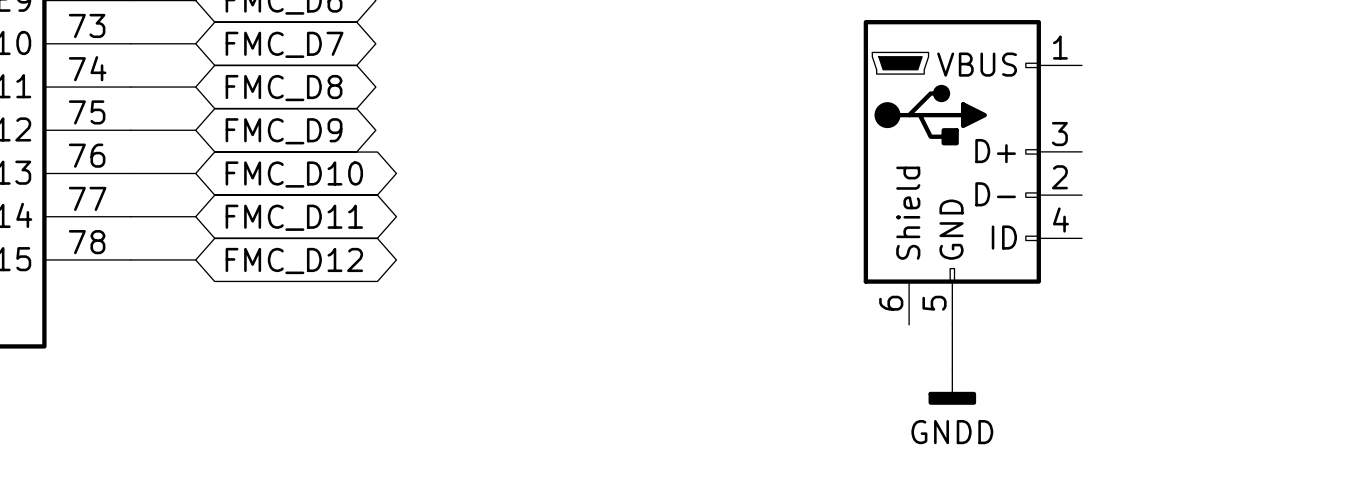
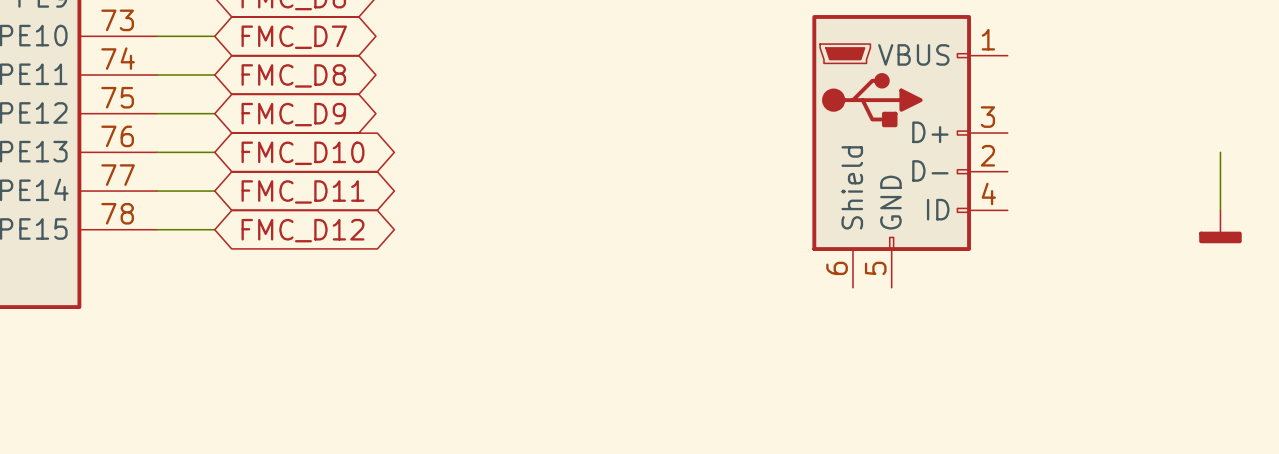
wire: none -> (1220, 152) (1220, 210)
power symbol: none -> (1220, 226)
wire: (952, 324) (952, 368) -> none
power symbol: GNDD (952, 386) -> none

